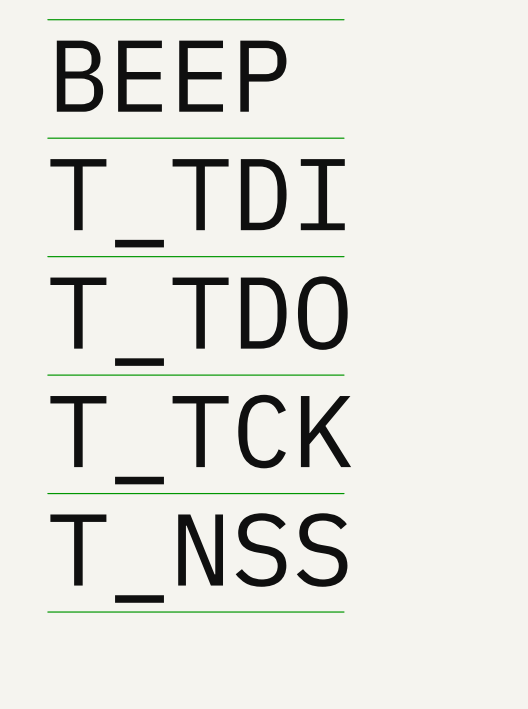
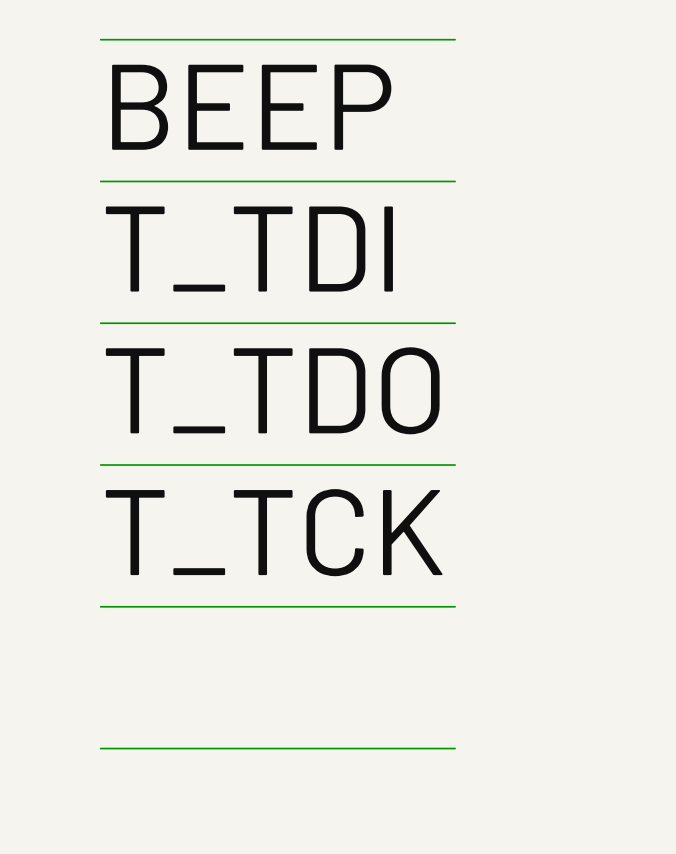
label: T_NSS (198, 558) -> none

